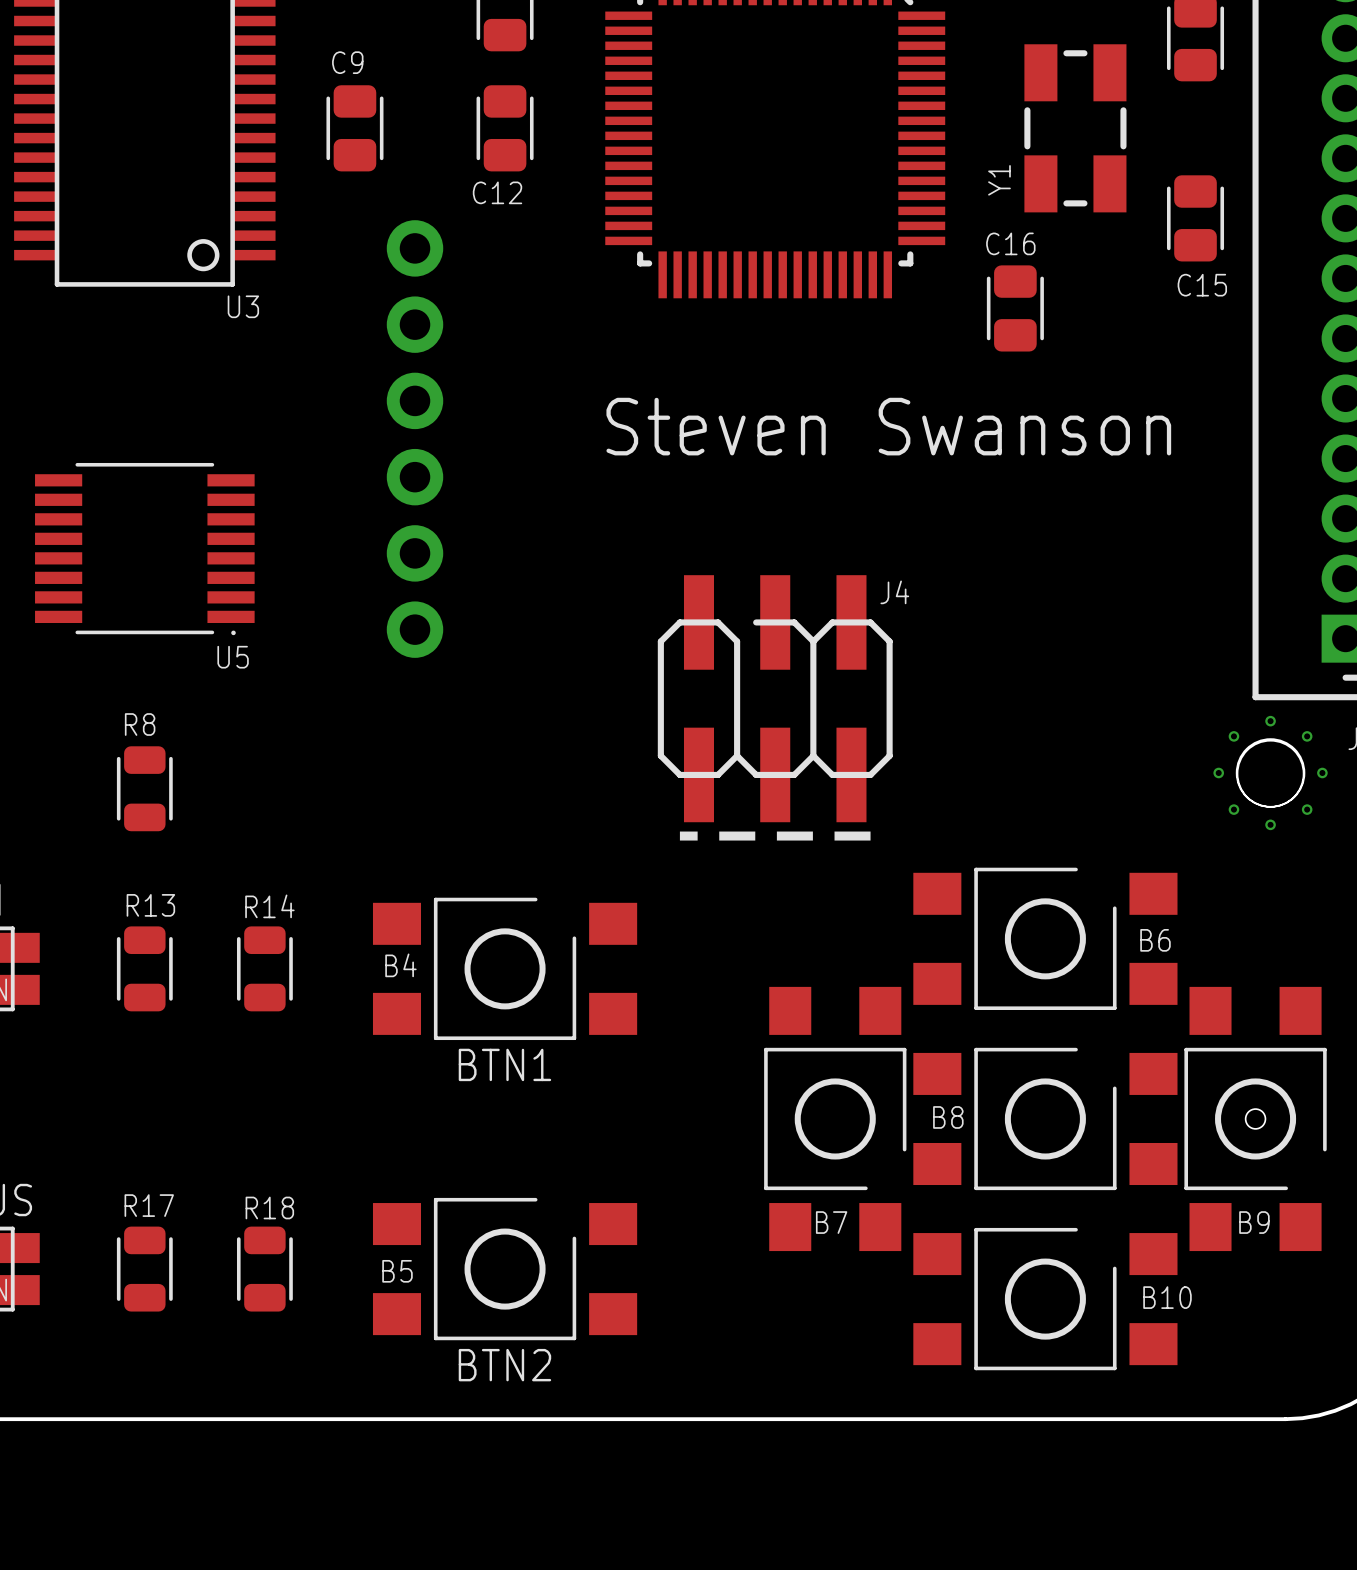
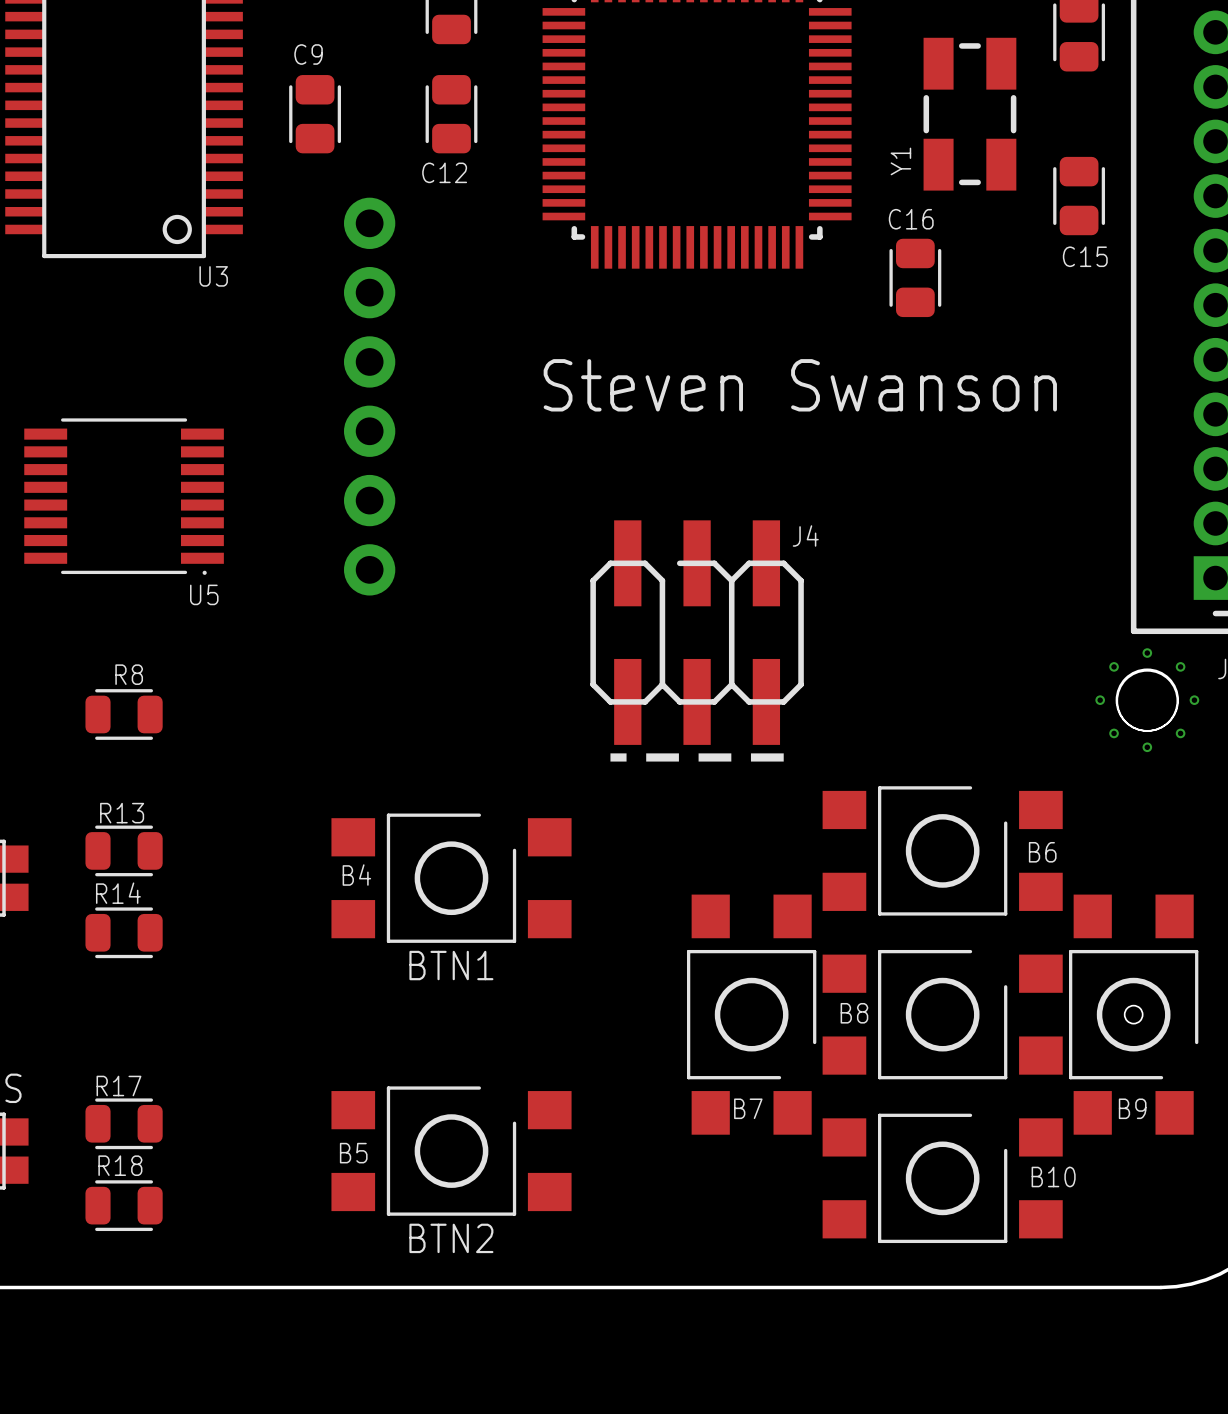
R8 rotation: 0° (144, 788) -> 90° clockwise (124, 714)
R13 rotation: 0° (144, 968) -> 90° clockwise (124, 850)
R14 rotation: 0° (264, 968) -> 90° clockwise (124, 932)
R14 position: (264, 968) -> (124, 932)
R17 rotation: 0° (144, 1269) -> 90° clockwise (124, 1123)
R18 rotation: 0° (264, 1269) -> 90° clockwise (124, 1205)
R18 position: (264, 1269) -> (124, 1205)

